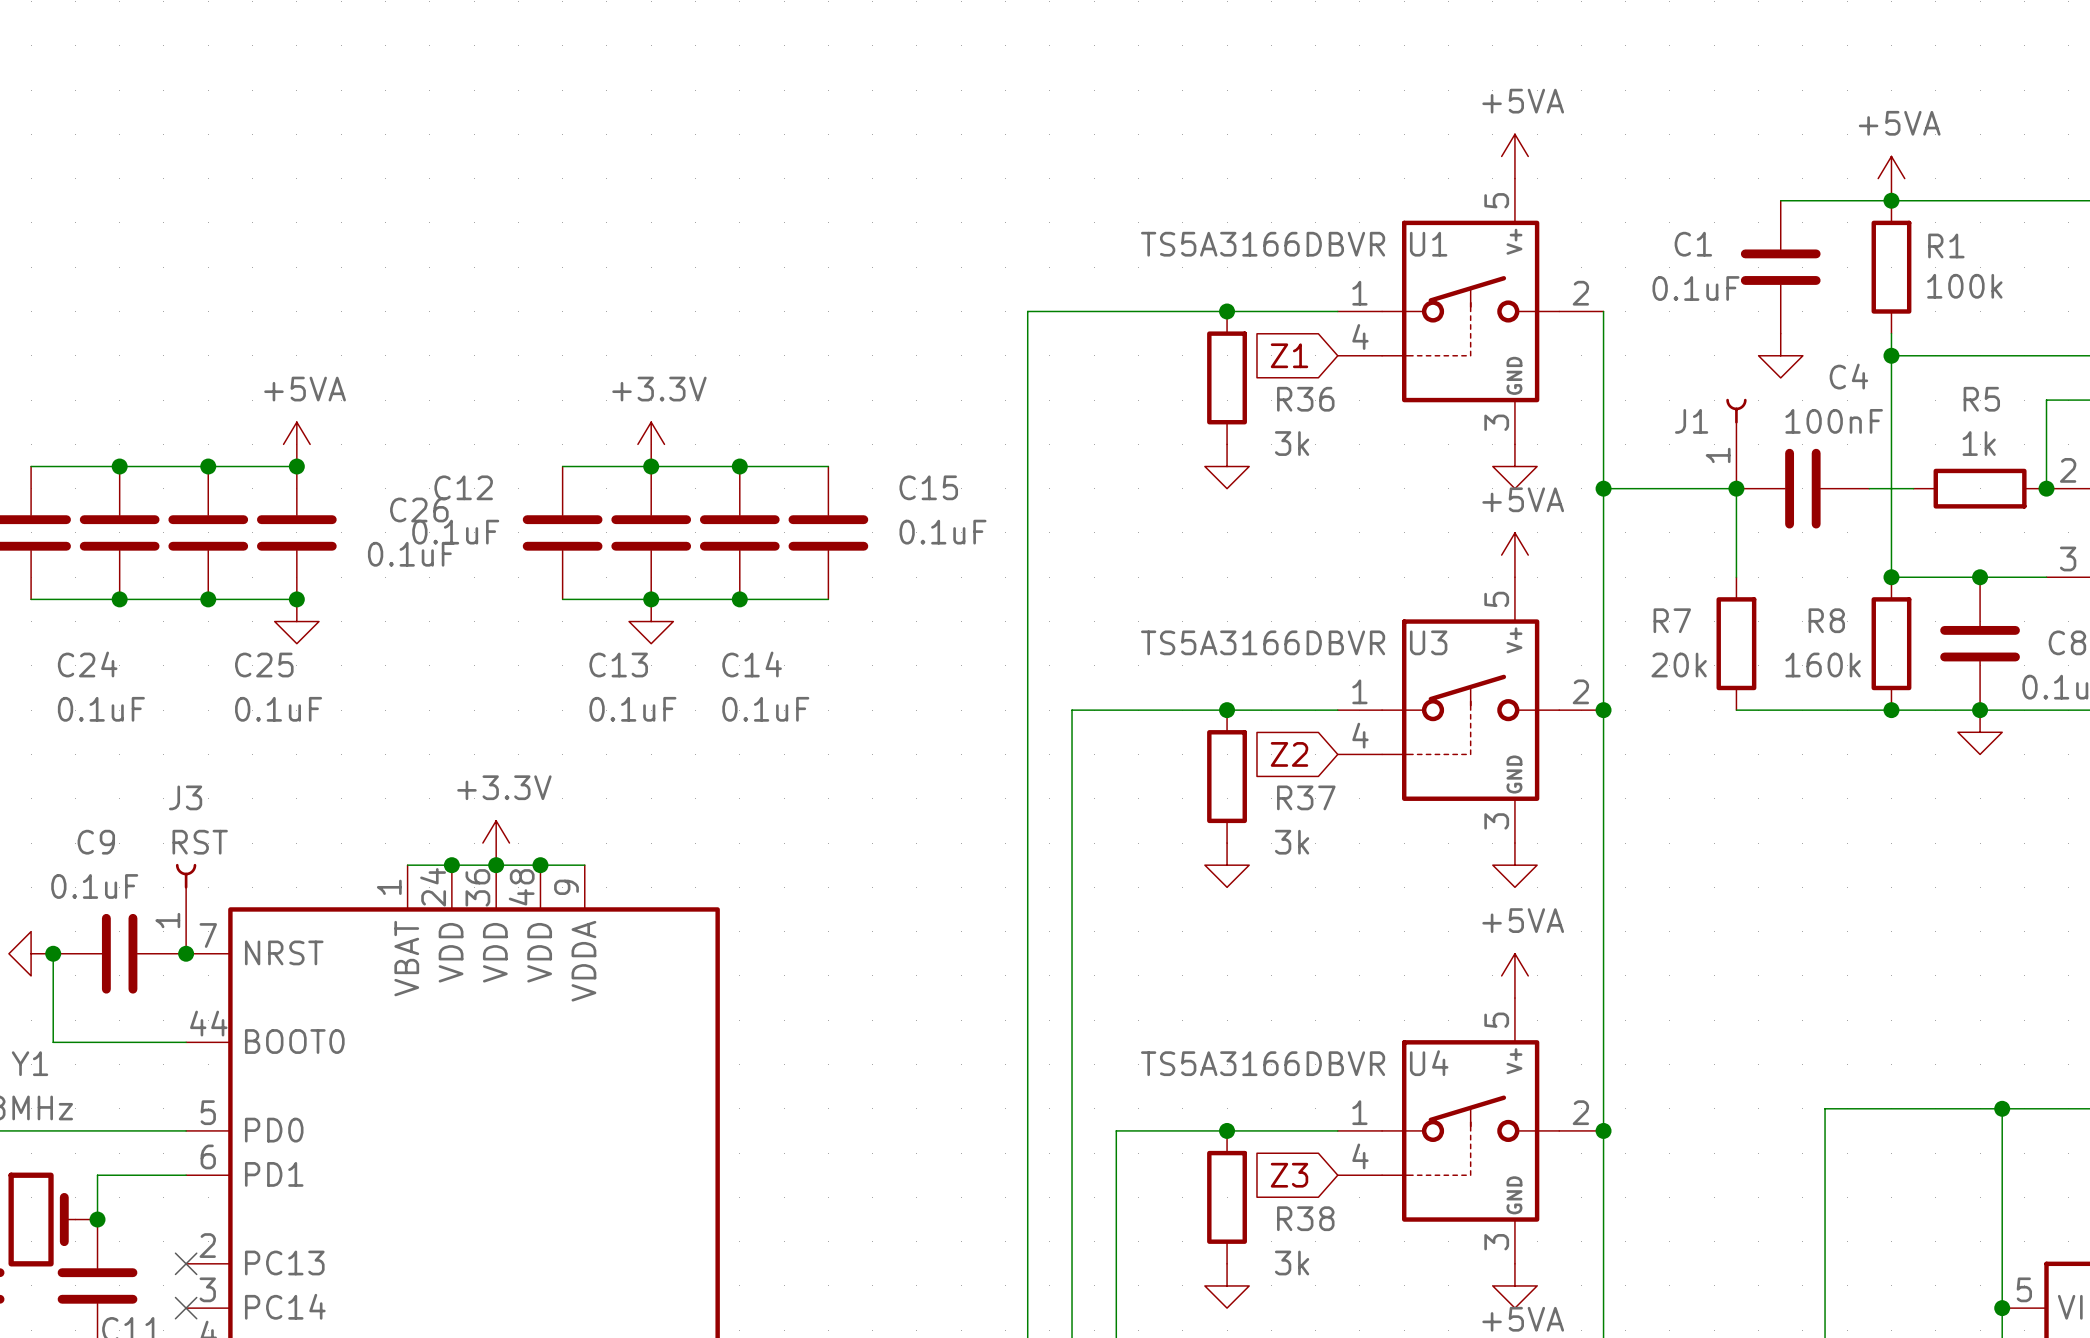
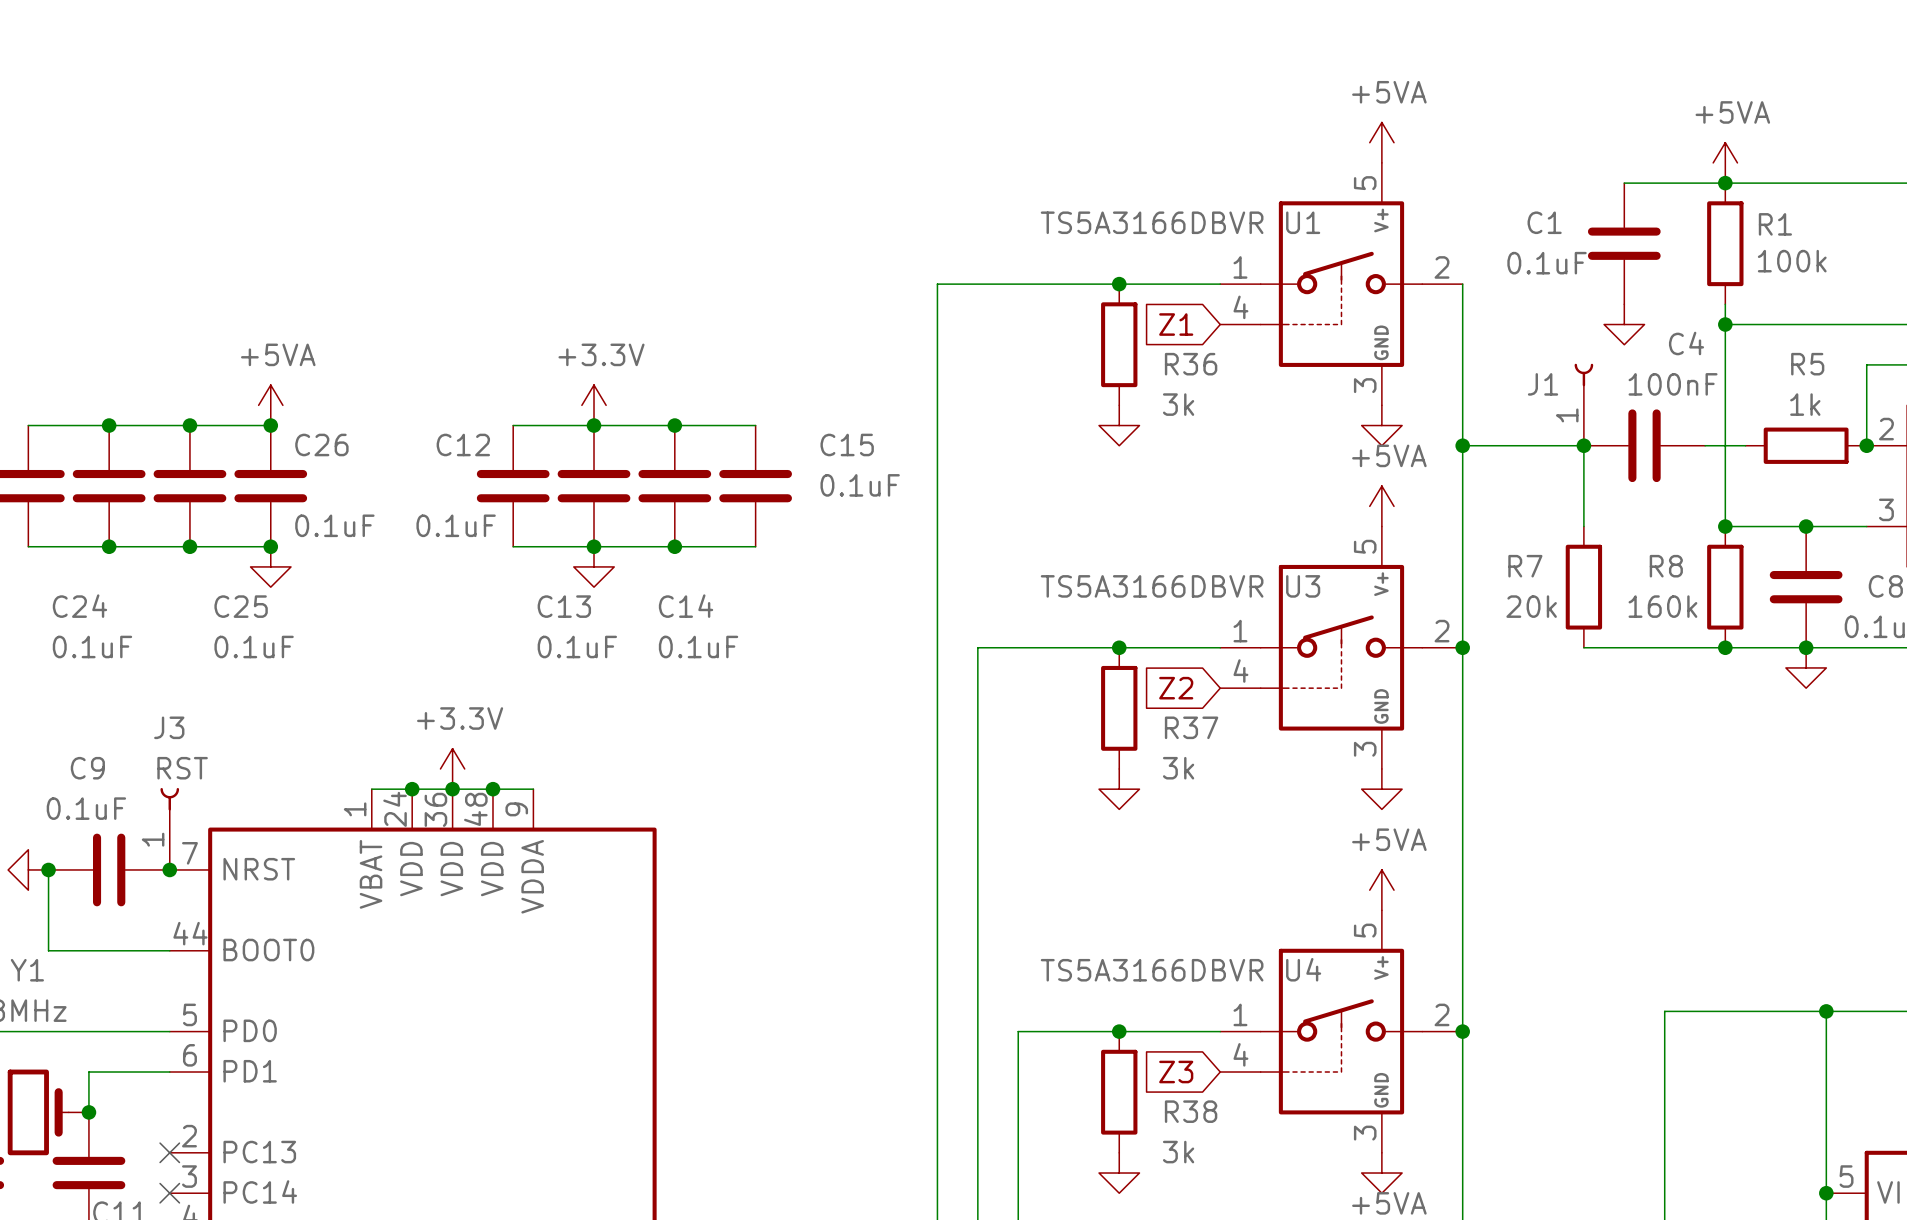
C12 name position: C12 (463, 487) -> C12 (463, 444)
C26 name position: C26 (419, 509) -> C26 (321, 444)
C12 value position: 0.1uF (455, 532) -> 0.1uF (456, 525)
C26 value position: 0.1uF (411, 554) -> 0.1uF (334, 525)

